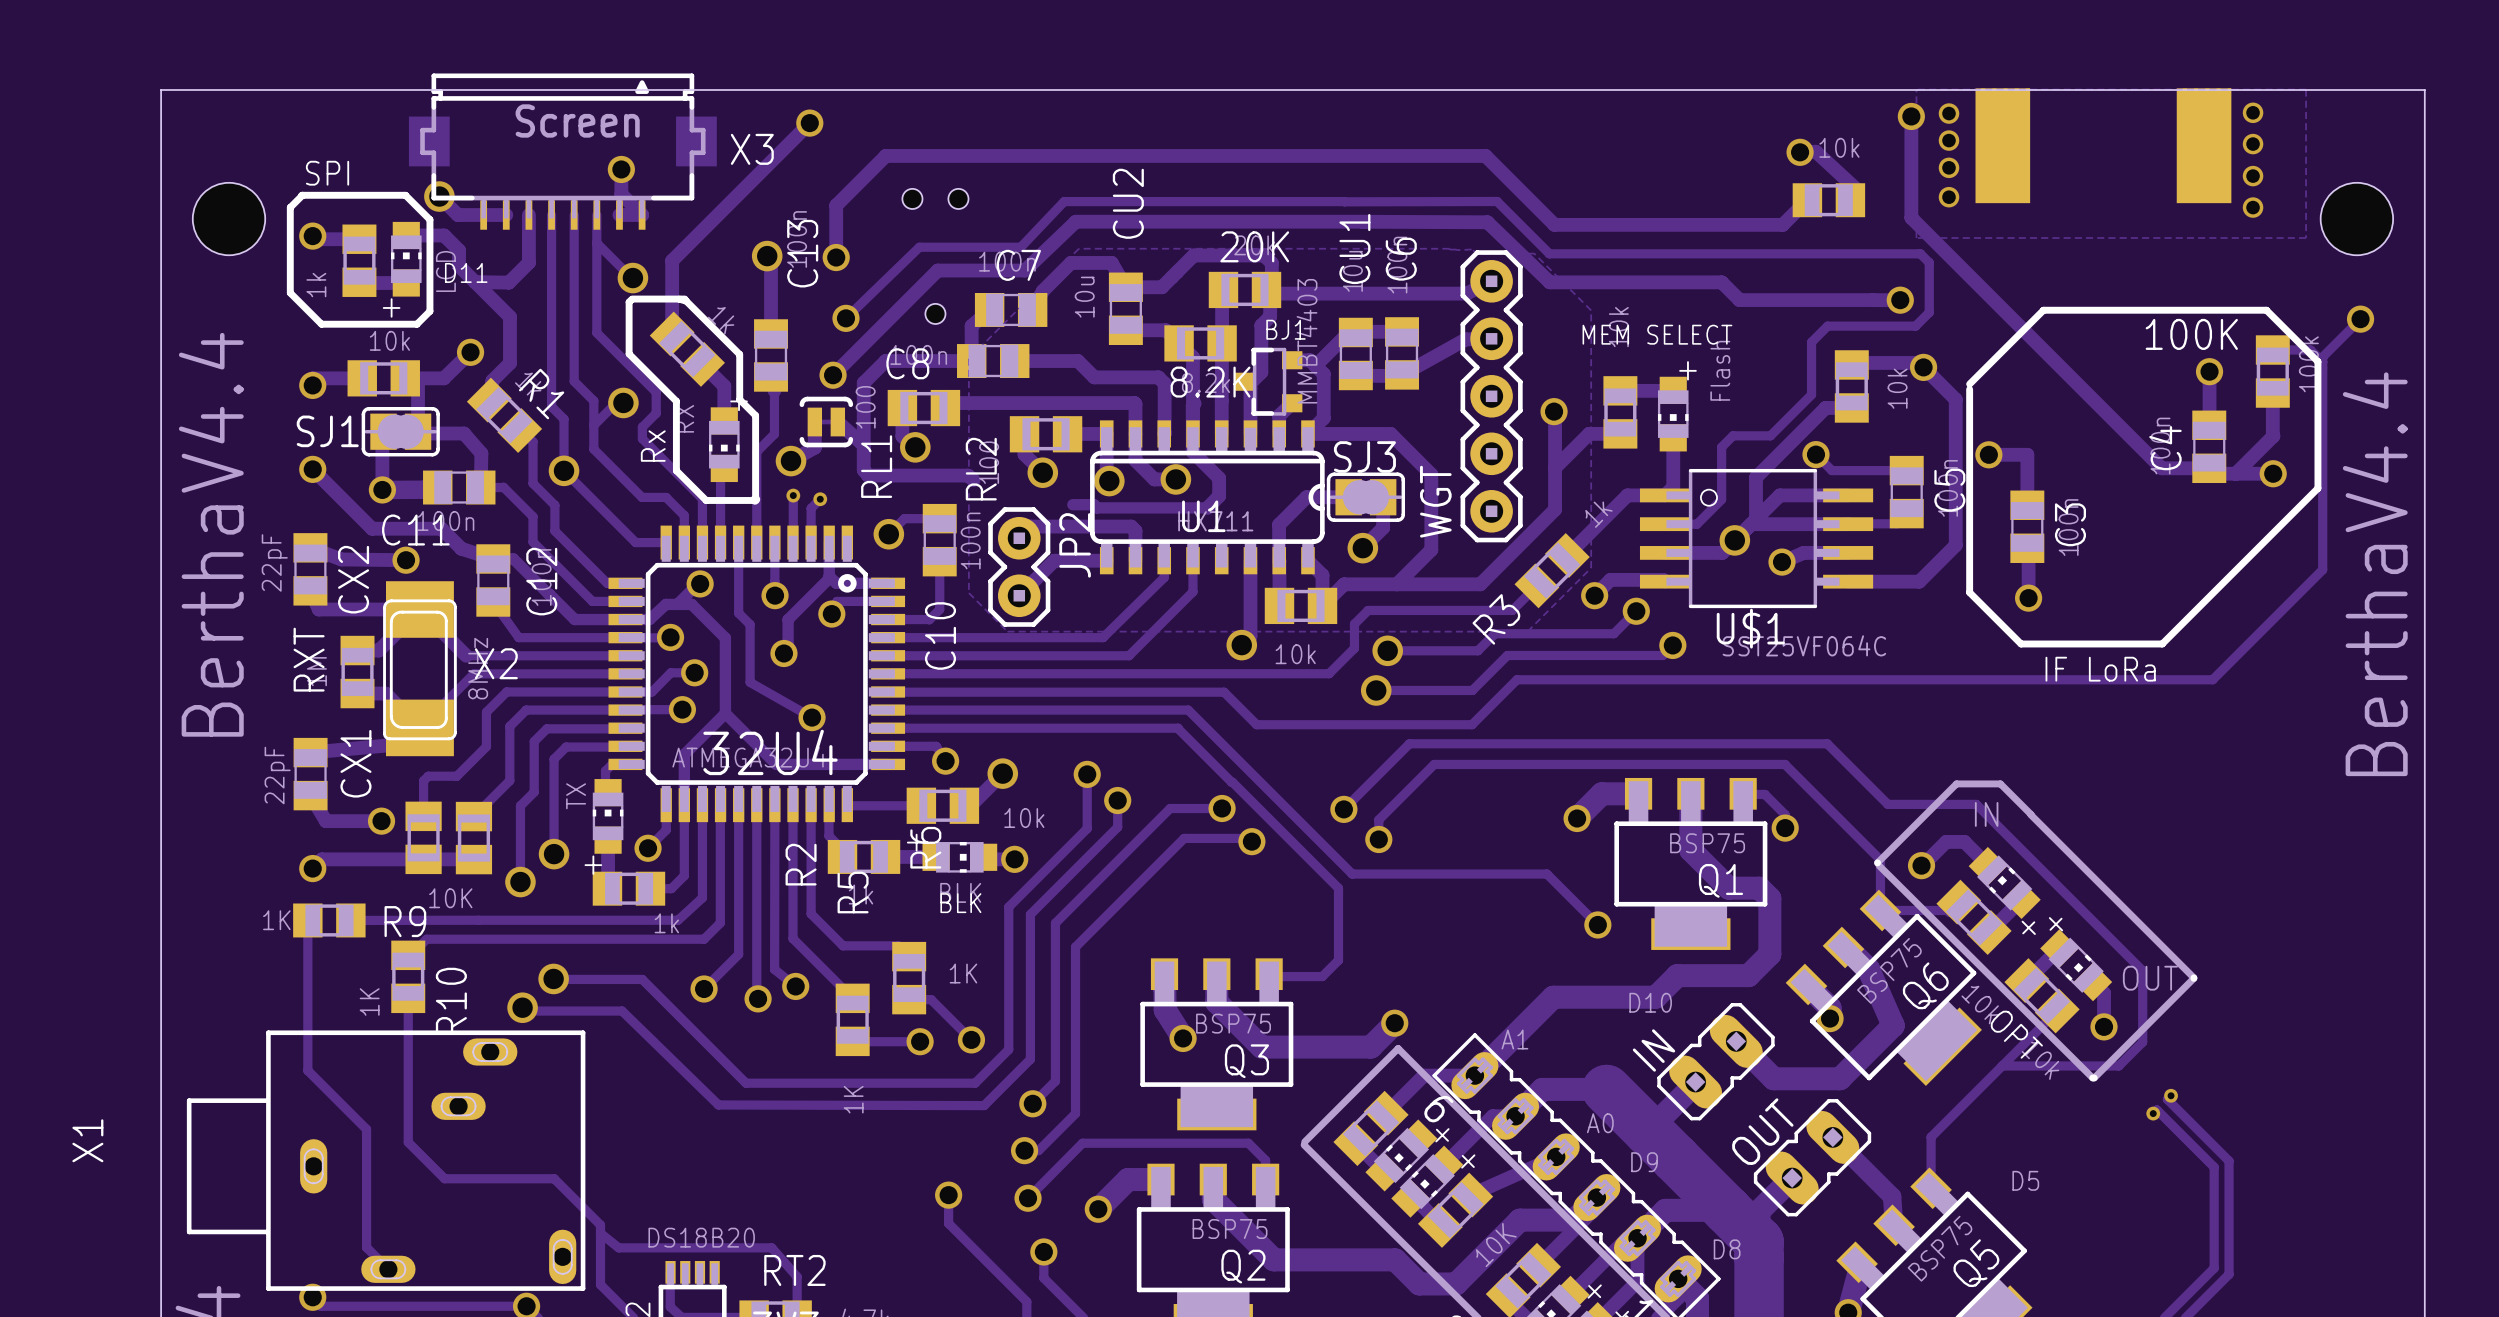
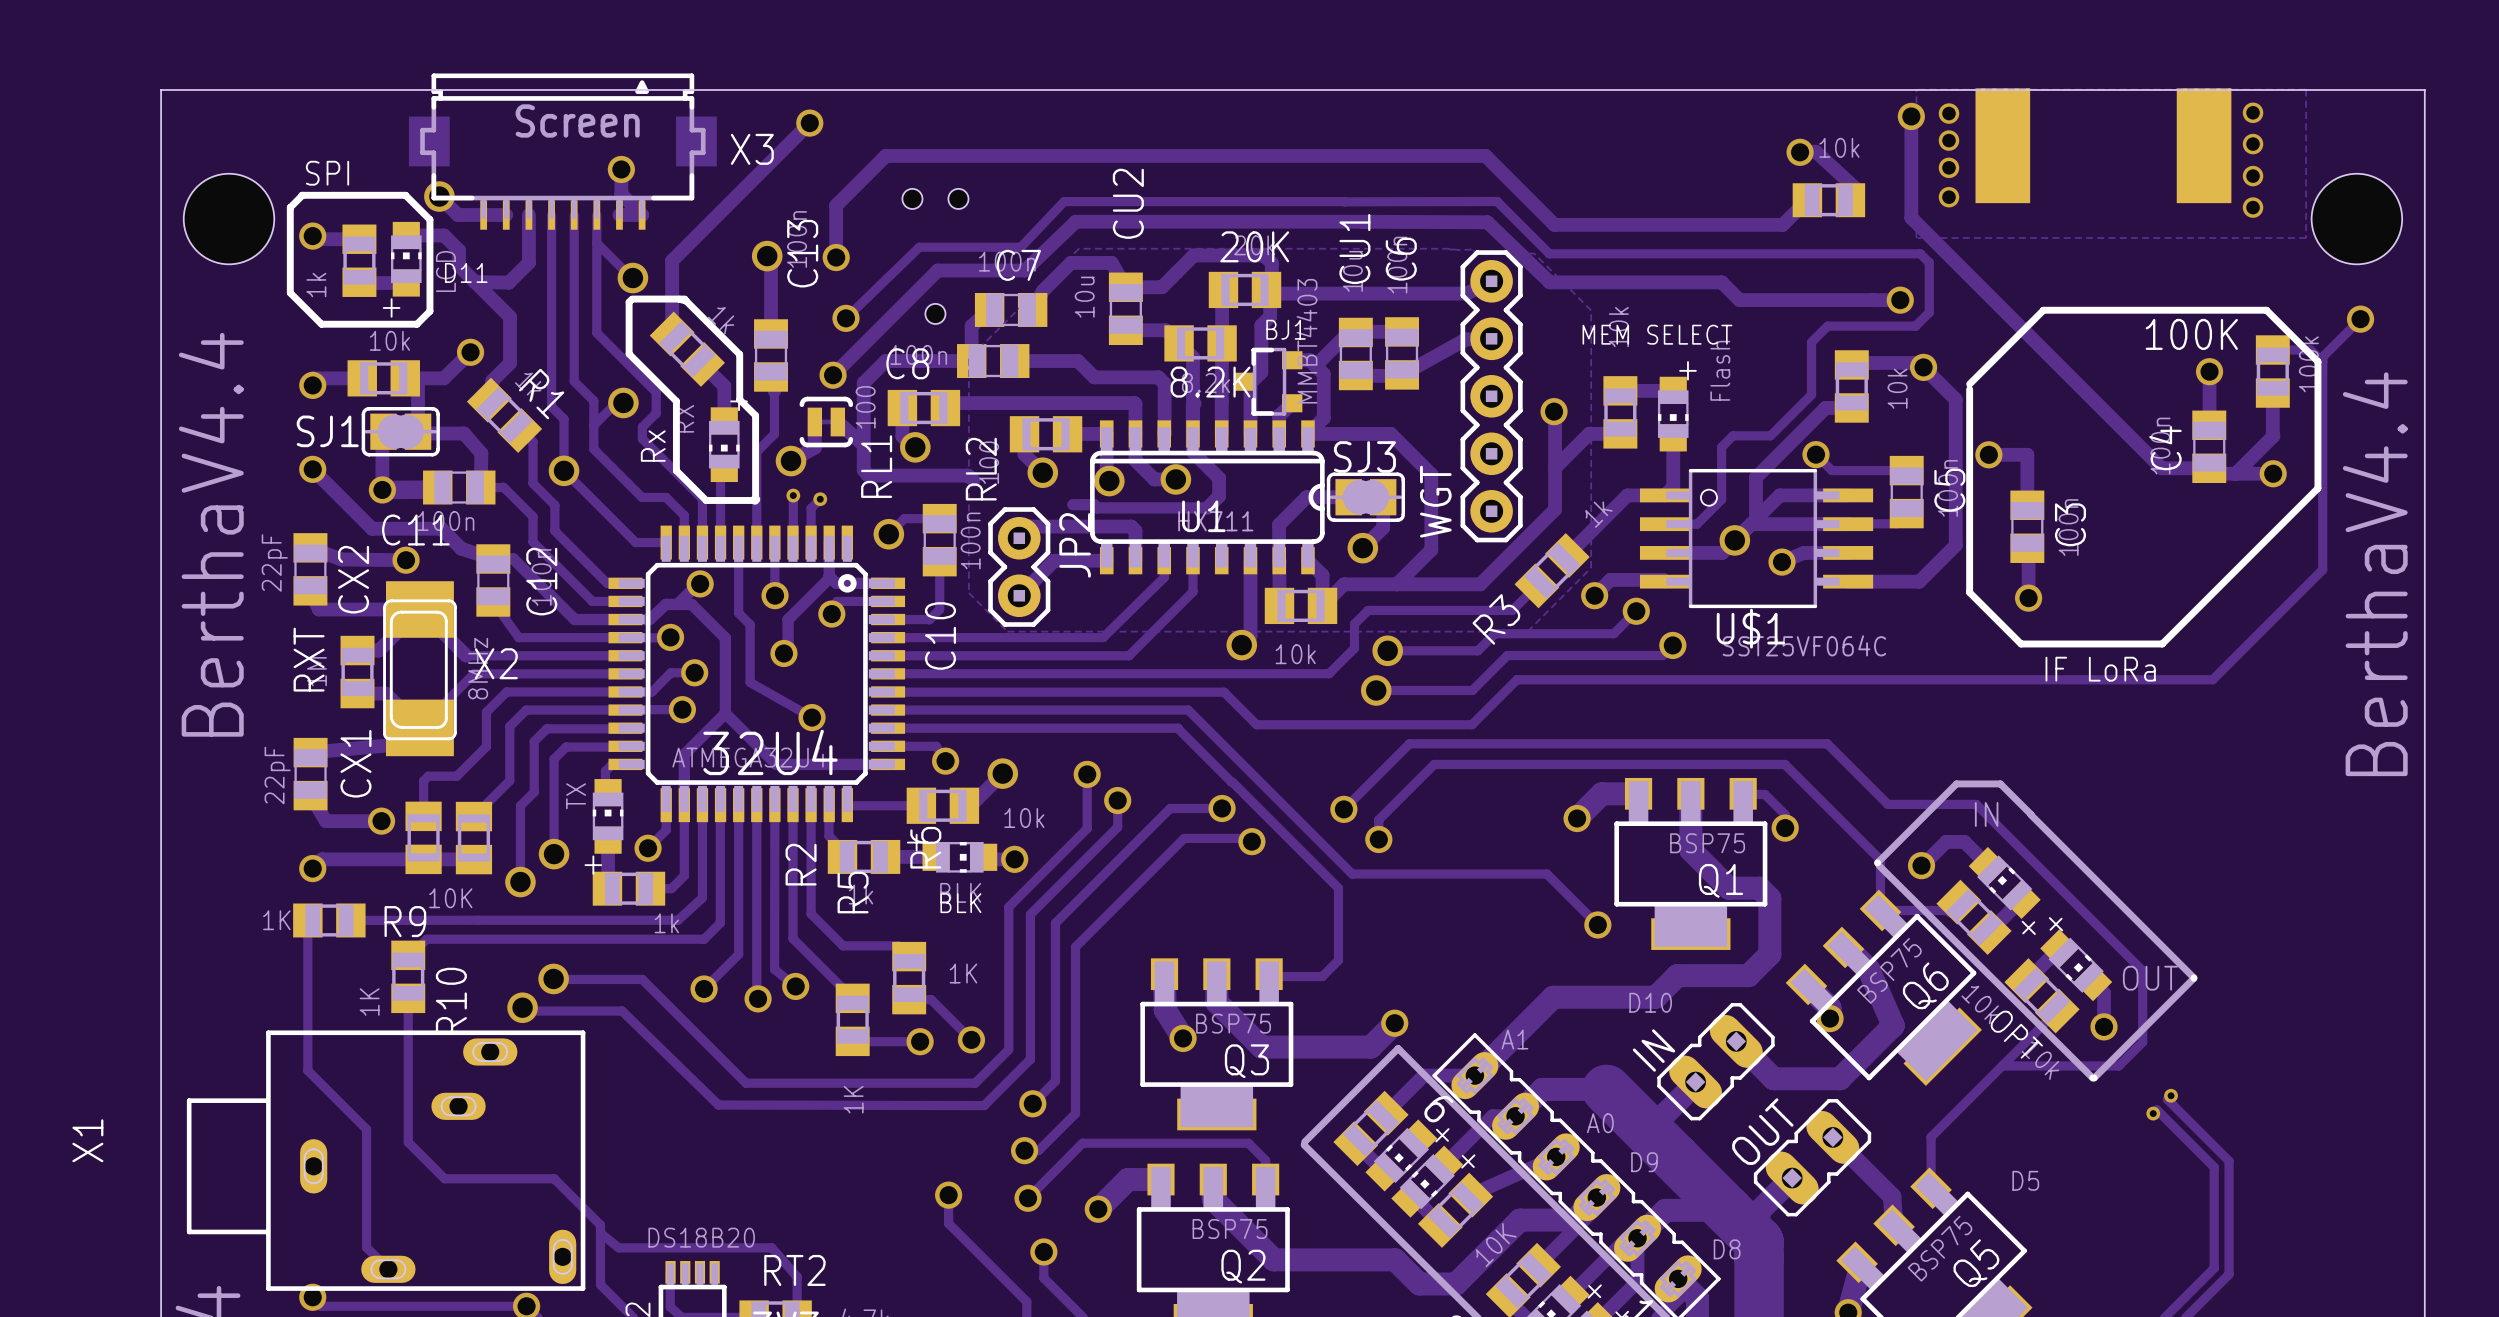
hole size: [192, 182, 266, 256] -> [183, 173, 275, 265]
hole size: [2320, 182, 2394, 256] -> [2311, 173, 2403, 265]

